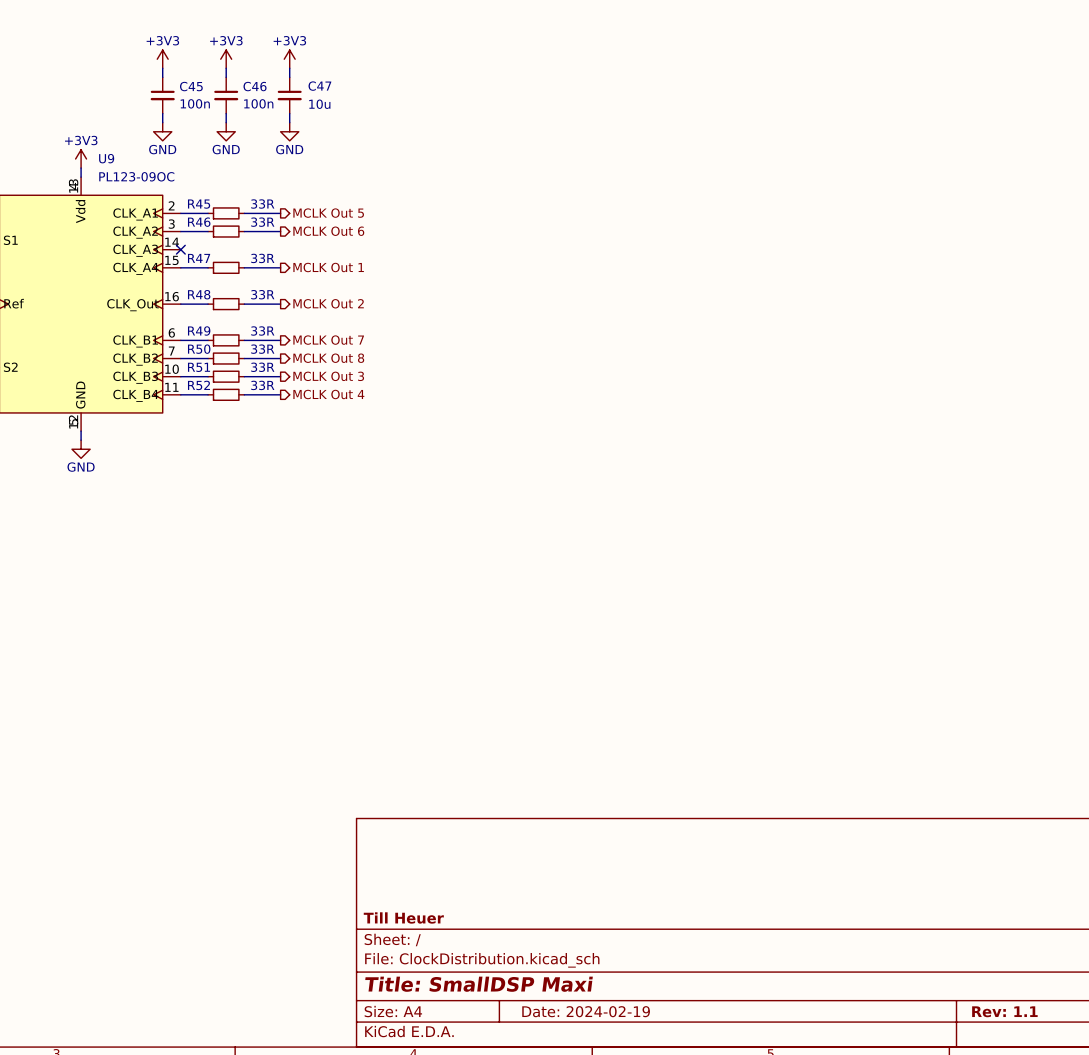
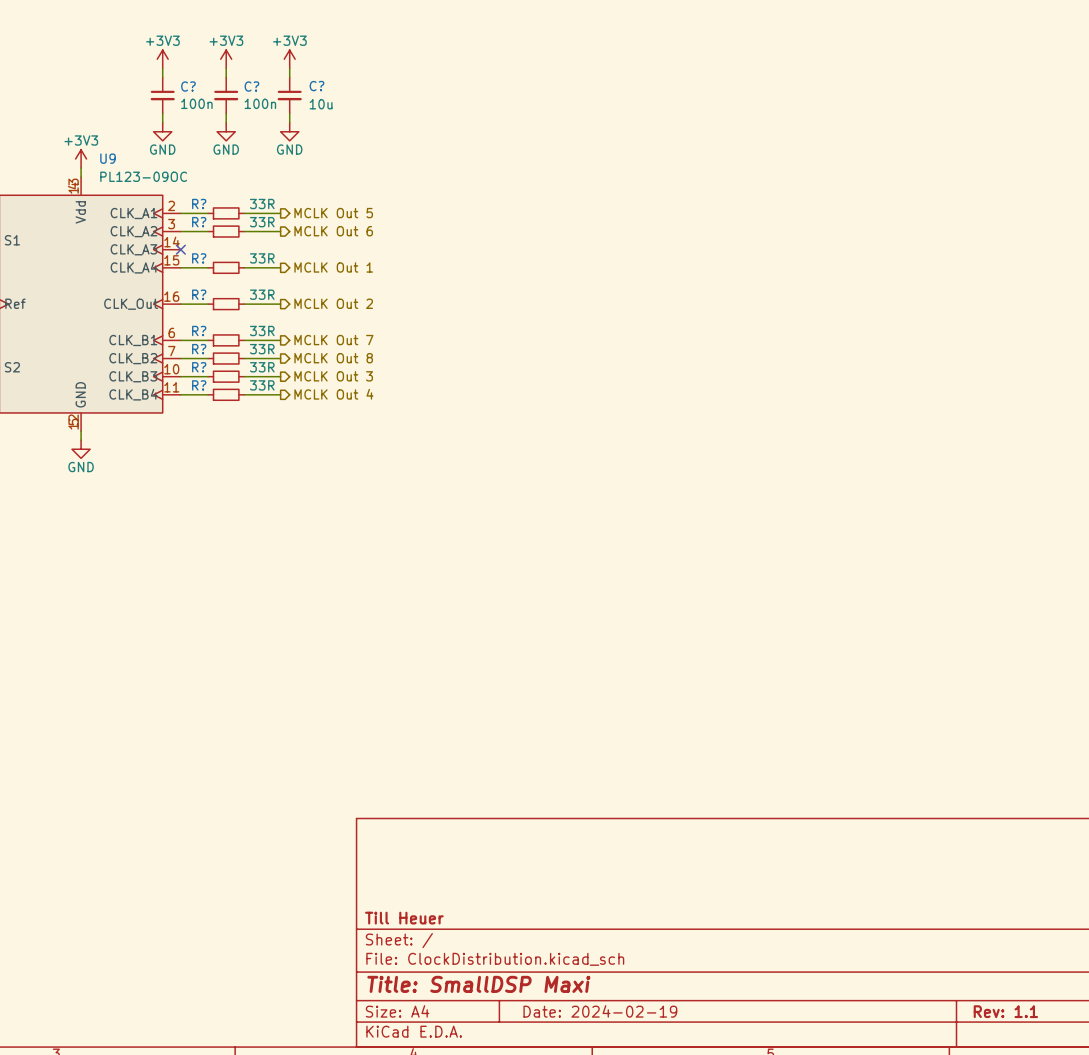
C45 name: C45 (191, 86) -> C? (188, 86)
C46 name: C46 (255, 86) -> C? (251, 86)
C47 name: C47 (319, 86) -> C? (316, 86)
R45 name: R45 (199, 204) -> R? (199, 204)
R46 name: R46 (199, 222) -> R? (199, 222)
R47 name: R47 (199, 258) -> R? (199, 258)
R48 name: R48 (199, 294) -> R? (199, 294)
R49 name: R49 (199, 331) -> R? (199, 330)
R50 name: R50 (199, 349) -> R? (199, 349)
R51 name: R51 (199, 367) -> R? (199, 367)
R52 name: R52 (198, 385) -> R? (199, 385)

